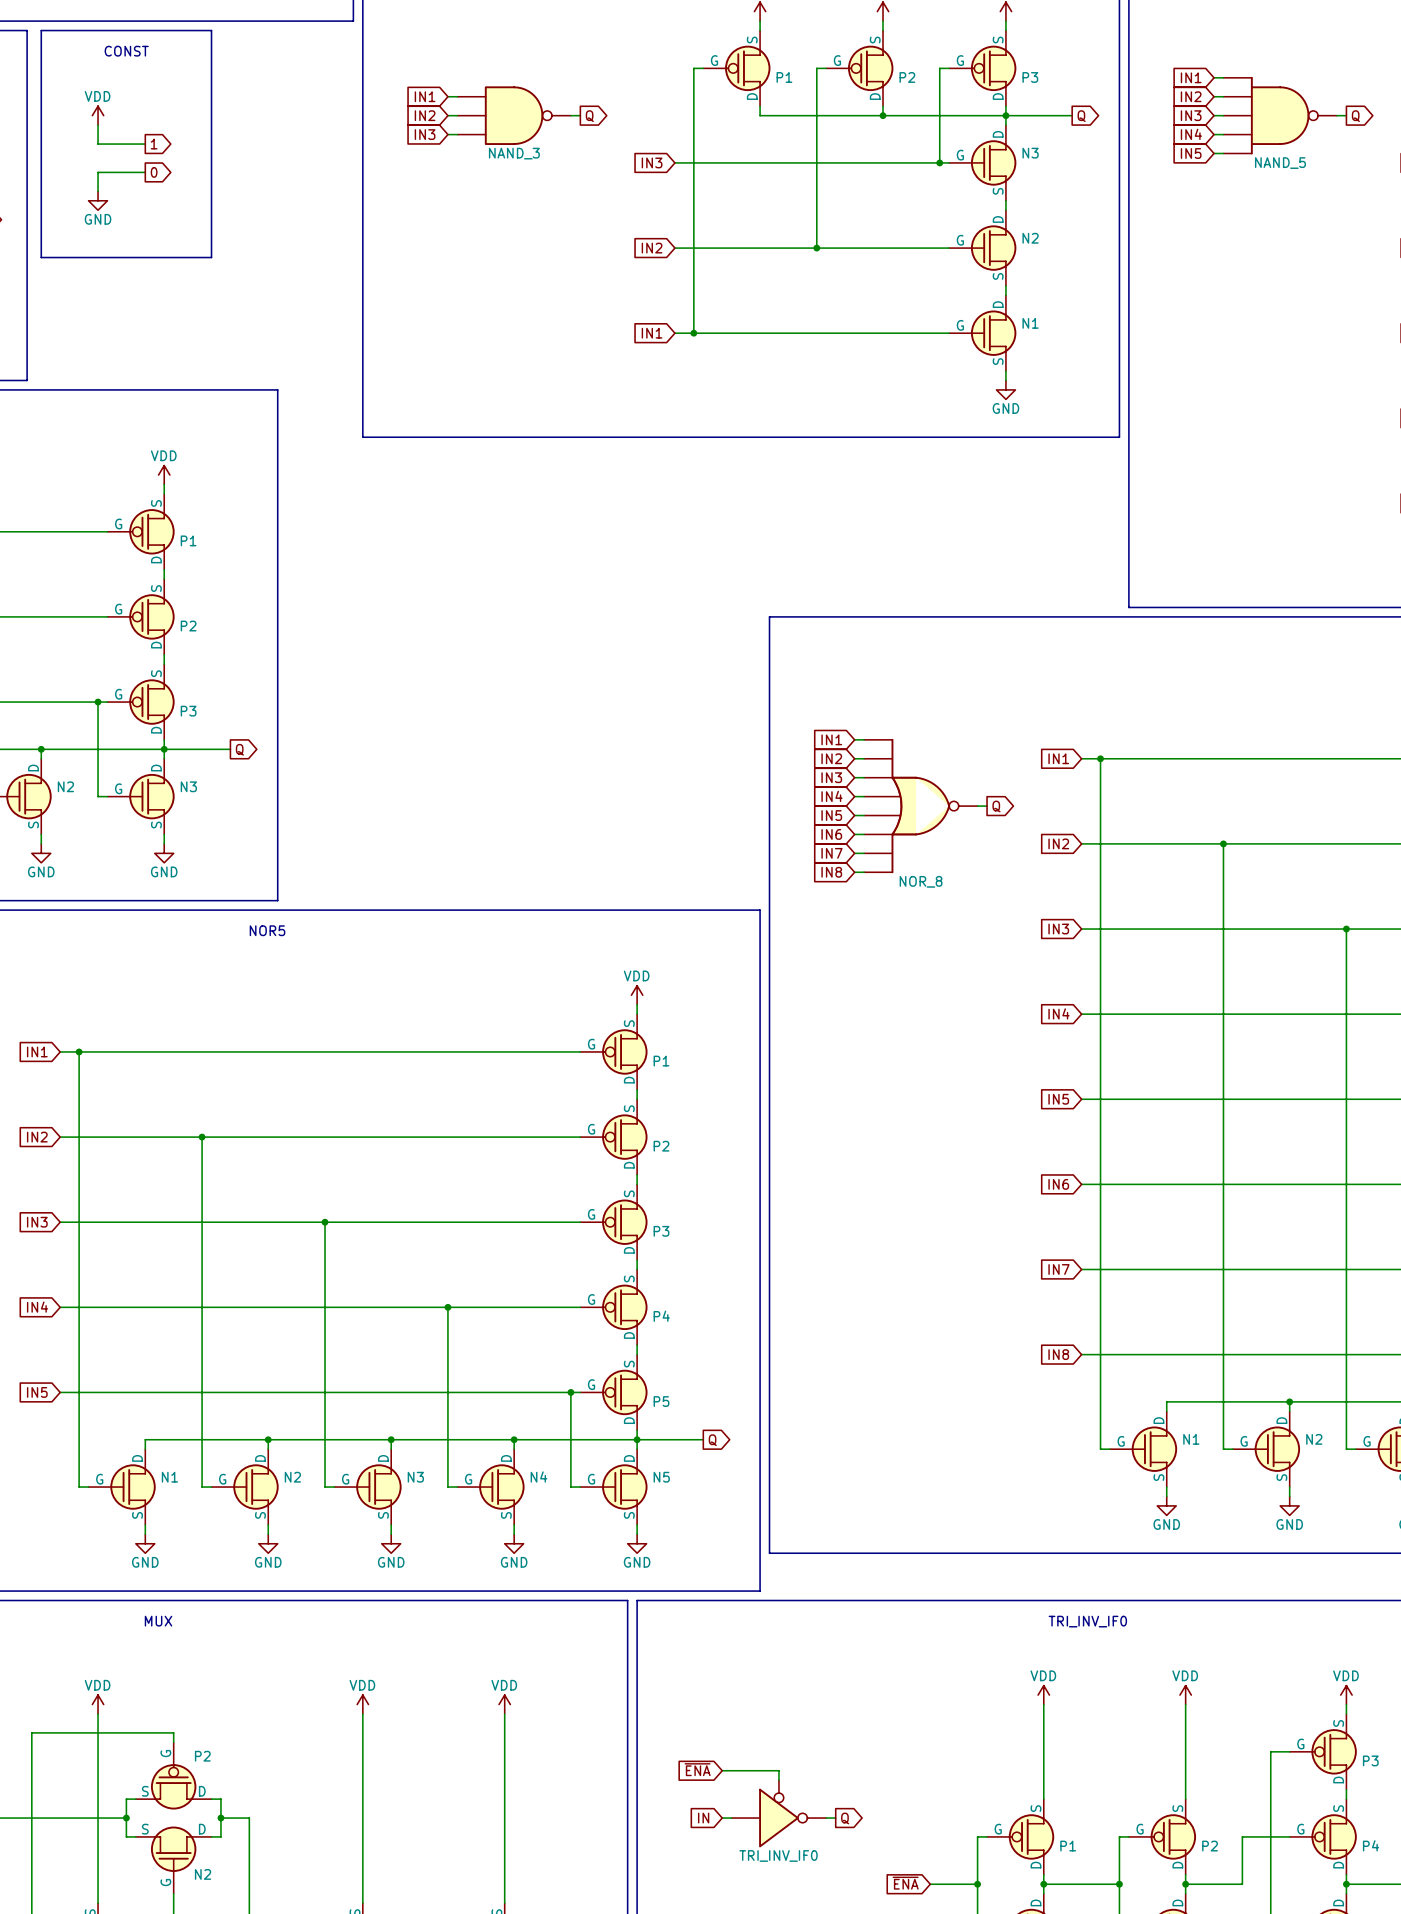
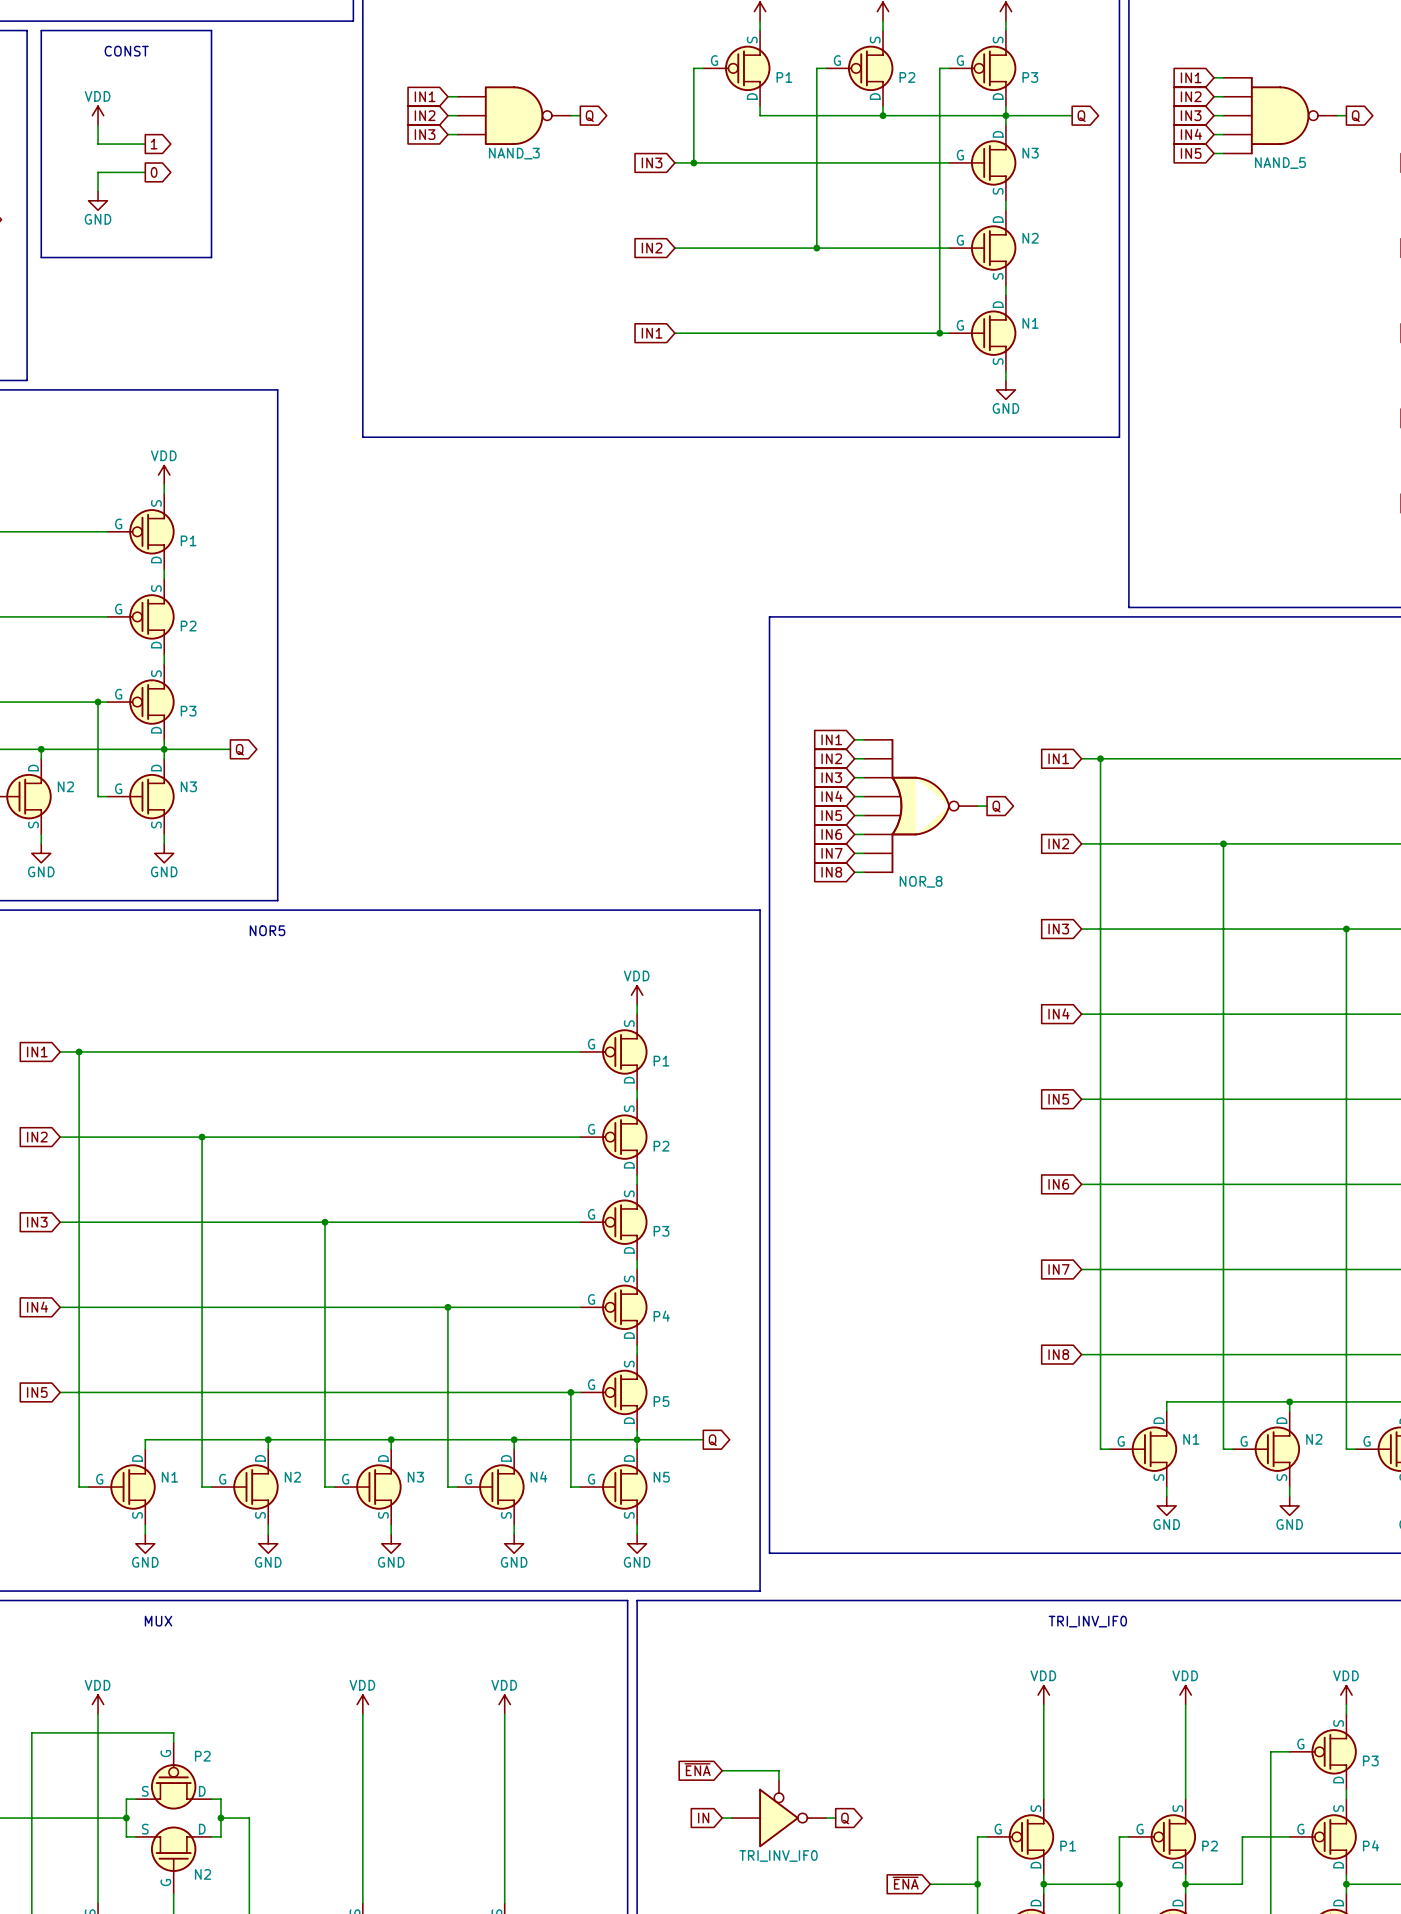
wire: (693, 162) (693, 333) -> none
junction: none -> (693, 162)
wire: none -> (939, 162) (939, 333)
junction: (939, 162) -> none
junction: (693, 333) -> none
junction: none -> (939, 333)

